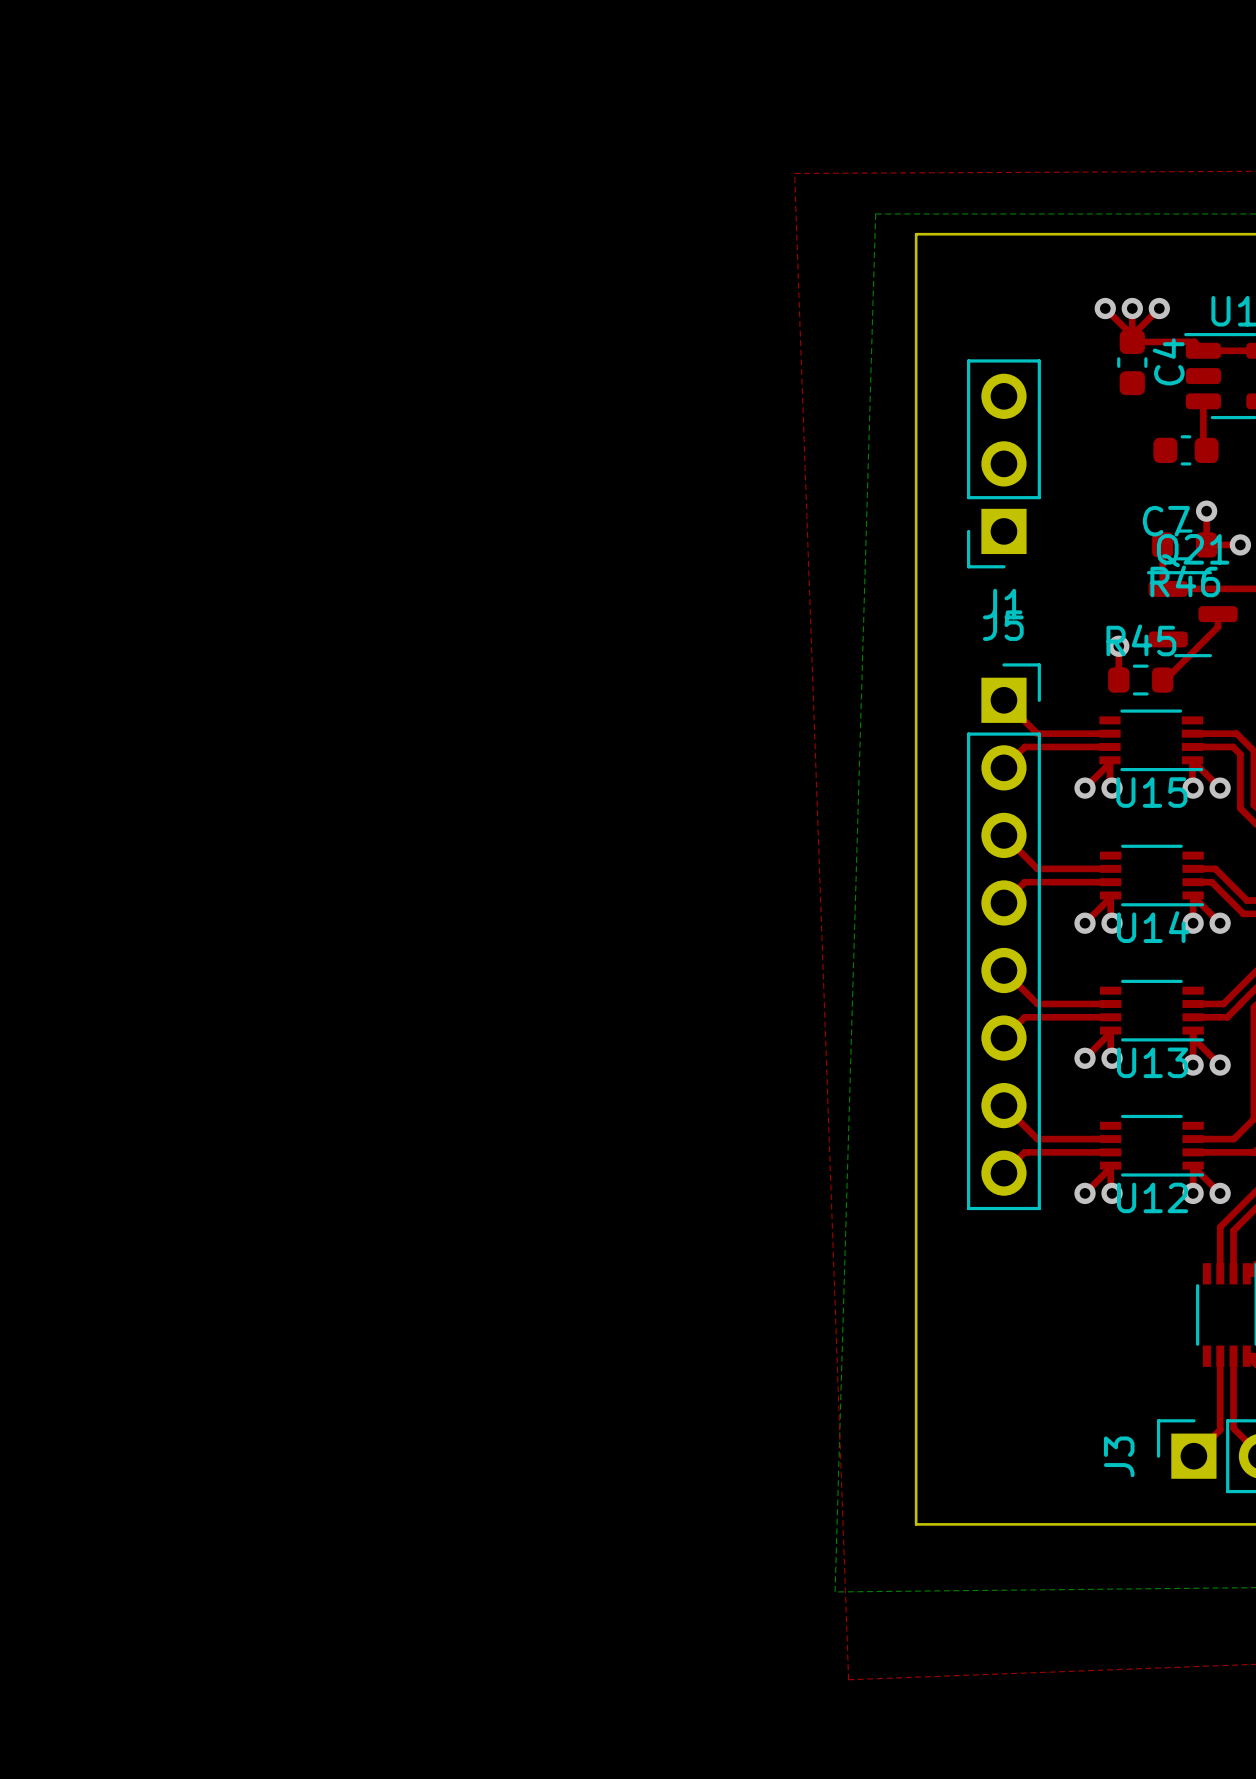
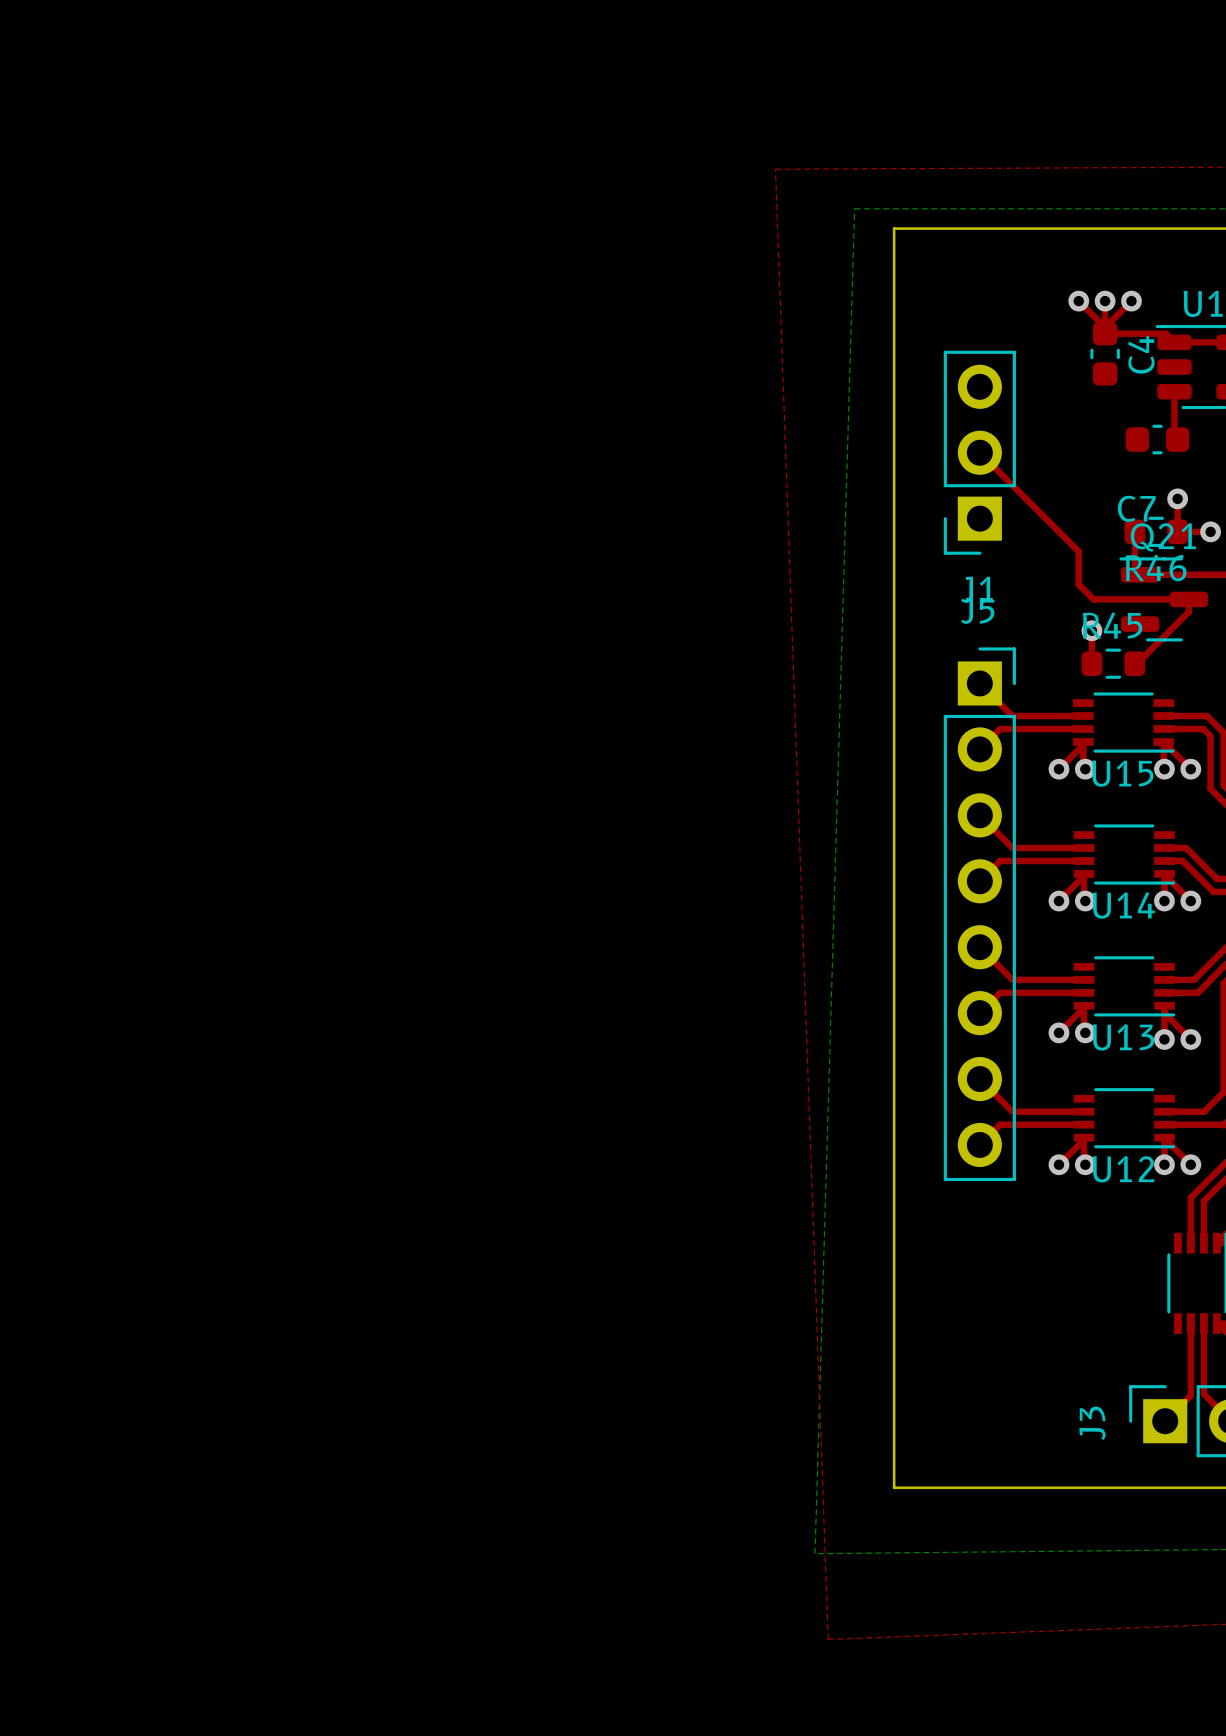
top track: none -> (979, 452) (1078, 551) (1078, 584) (1093, 599) (1188, 599)

